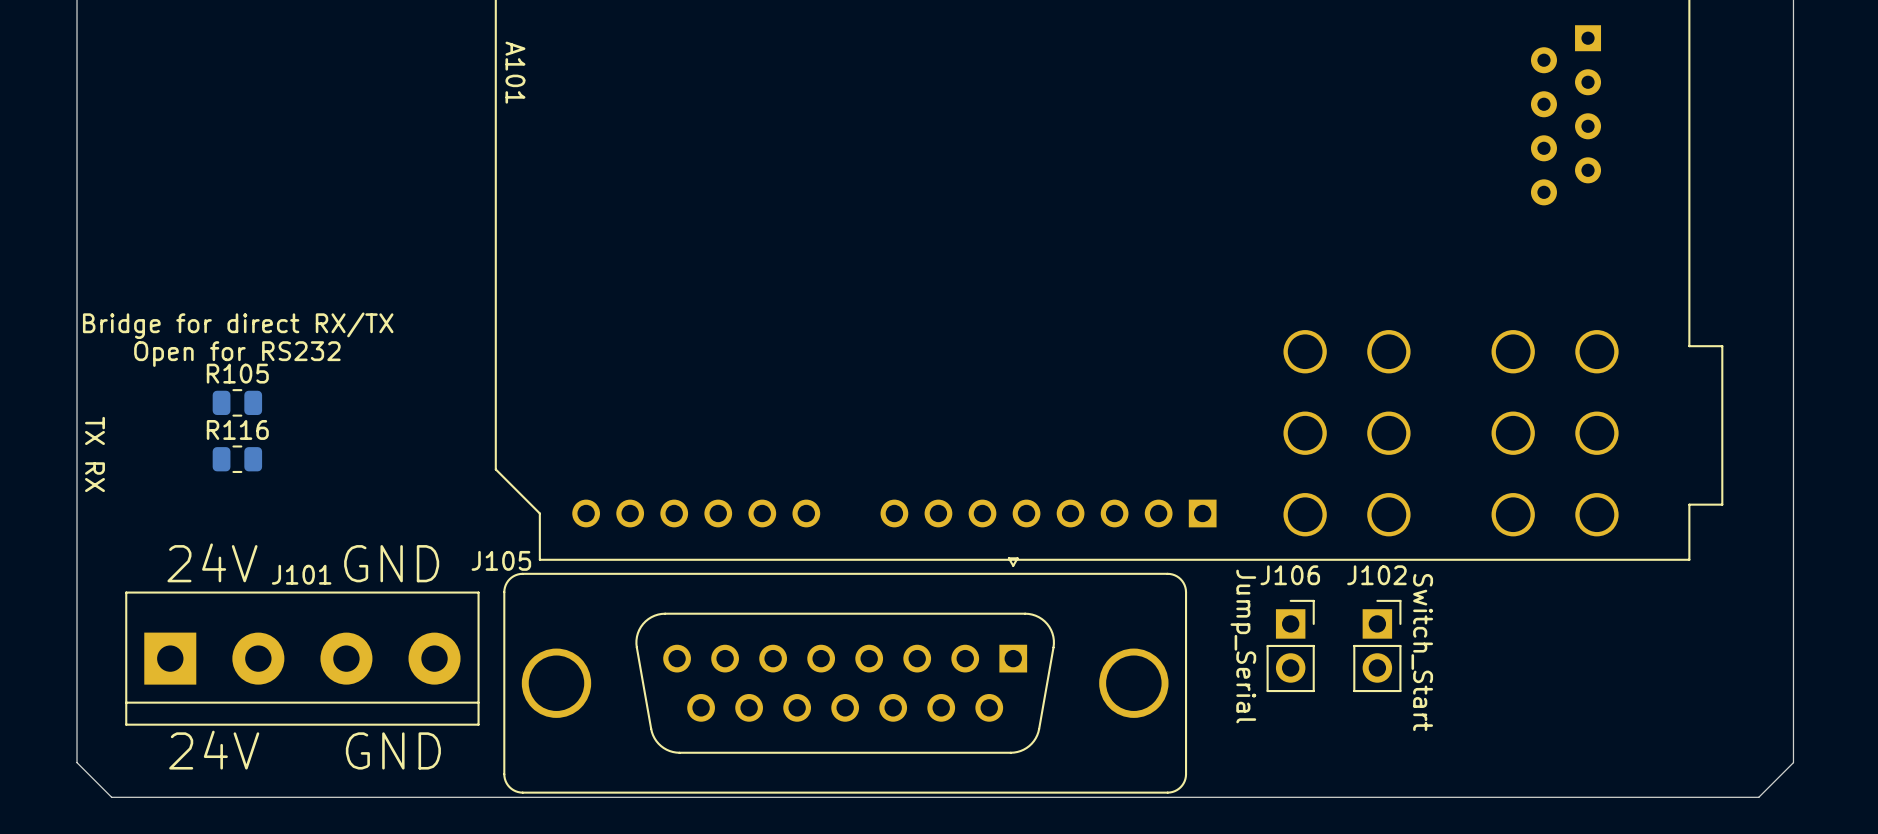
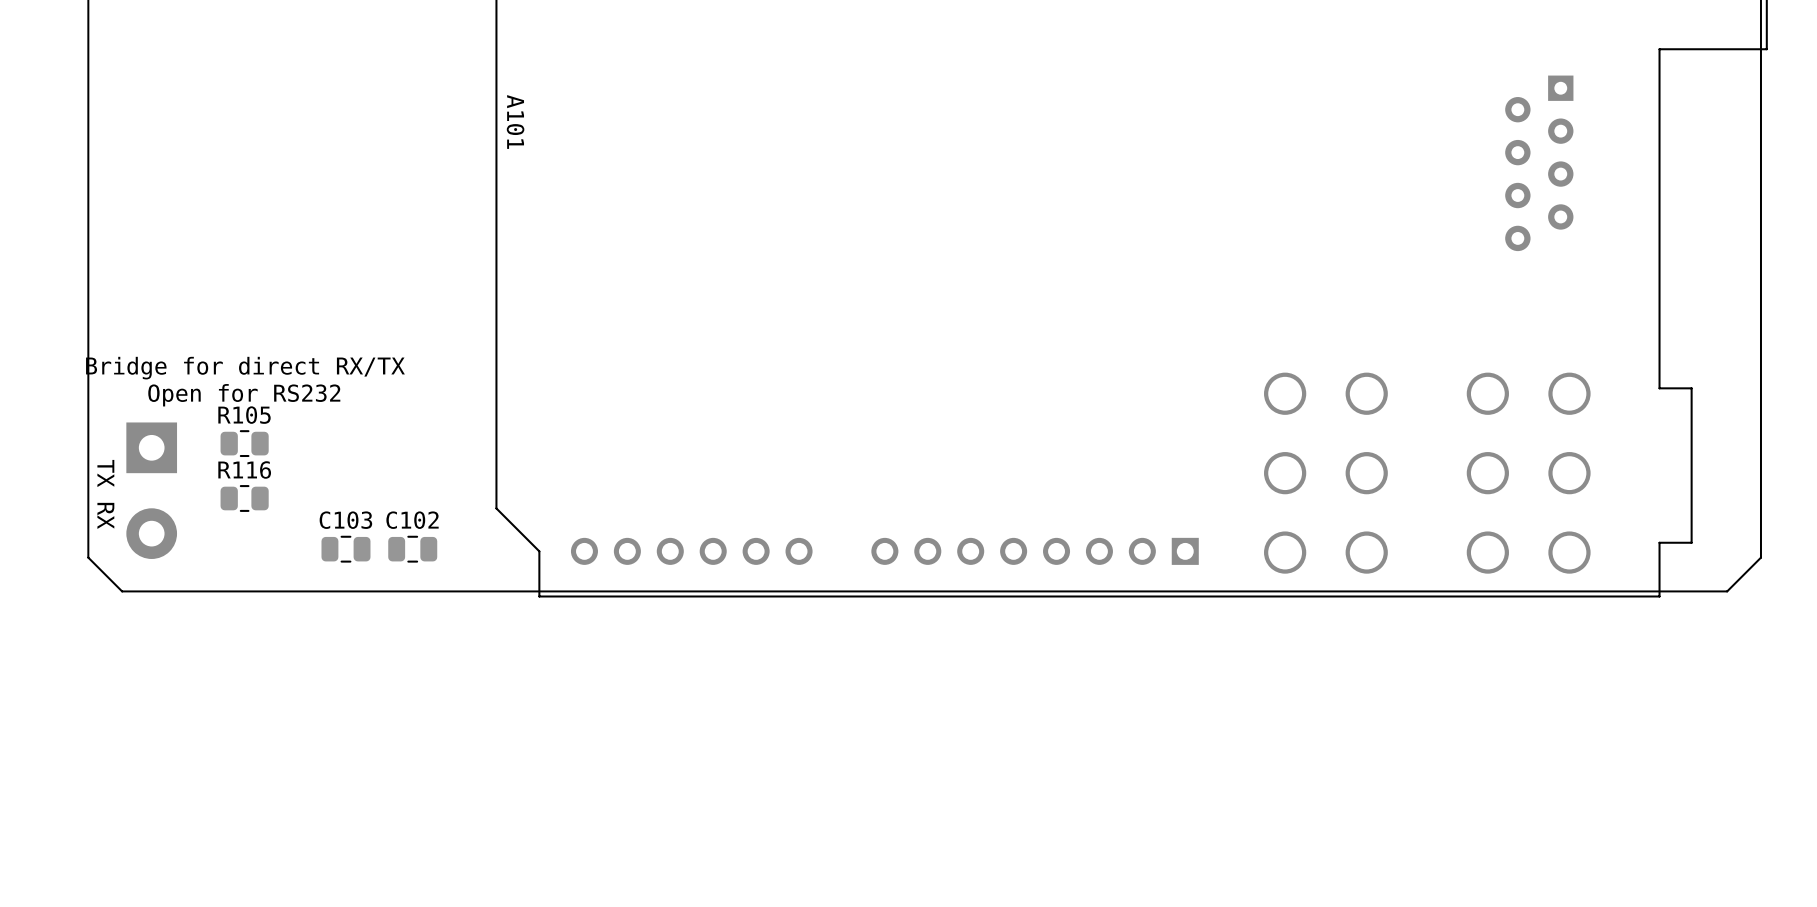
part: none -> (151, 490)
C103: none -> (345, 549)
C102: none -> (412, 549)
board edge: (1793, 519) (1793, 762) (1758, 797) (111, 797) (77, 762) (77, 519) -> (1760, 557) (1727, 591) (122, 591) (88, 557)
text: 24V GND (303, 562) -> none
J106: (1290, 645) -> none
J102: (1377, 645) -> none
text: Jump_Serial (1243, 646) -> none
text: Switch_Start (1422, 652) -> none
J101: (302, 658) -> none
J105: (845, 675) -> none
text: 24V GND (305, 750) -> none

